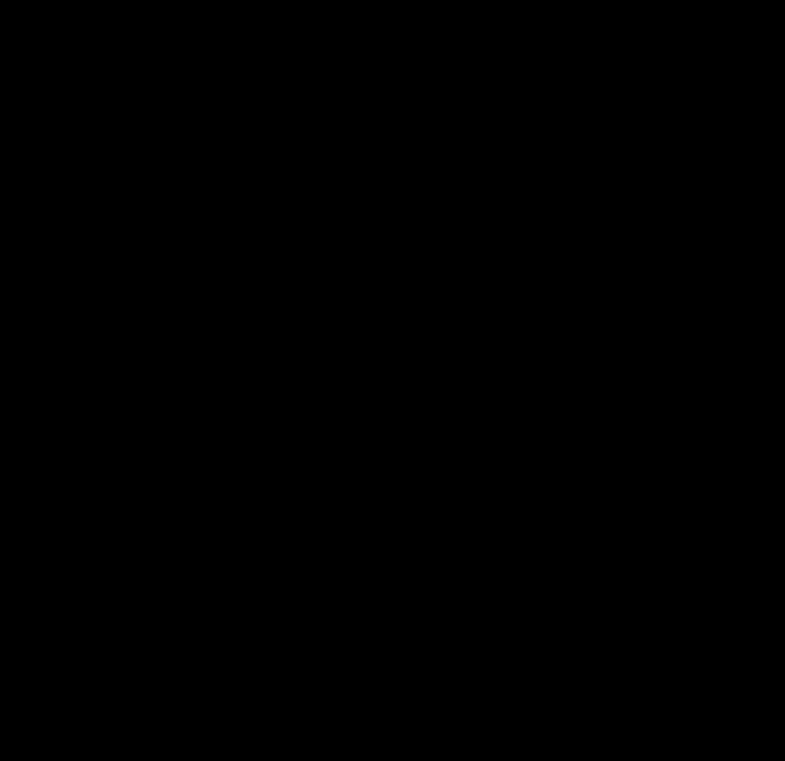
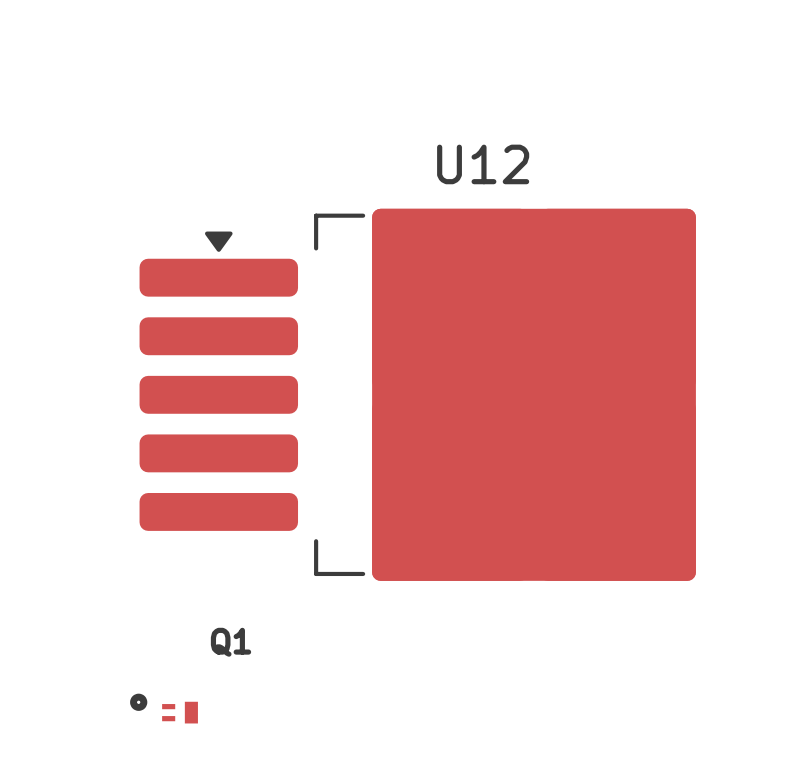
U12: none -> (417, 394)
Q1: none -> (164, 708)

